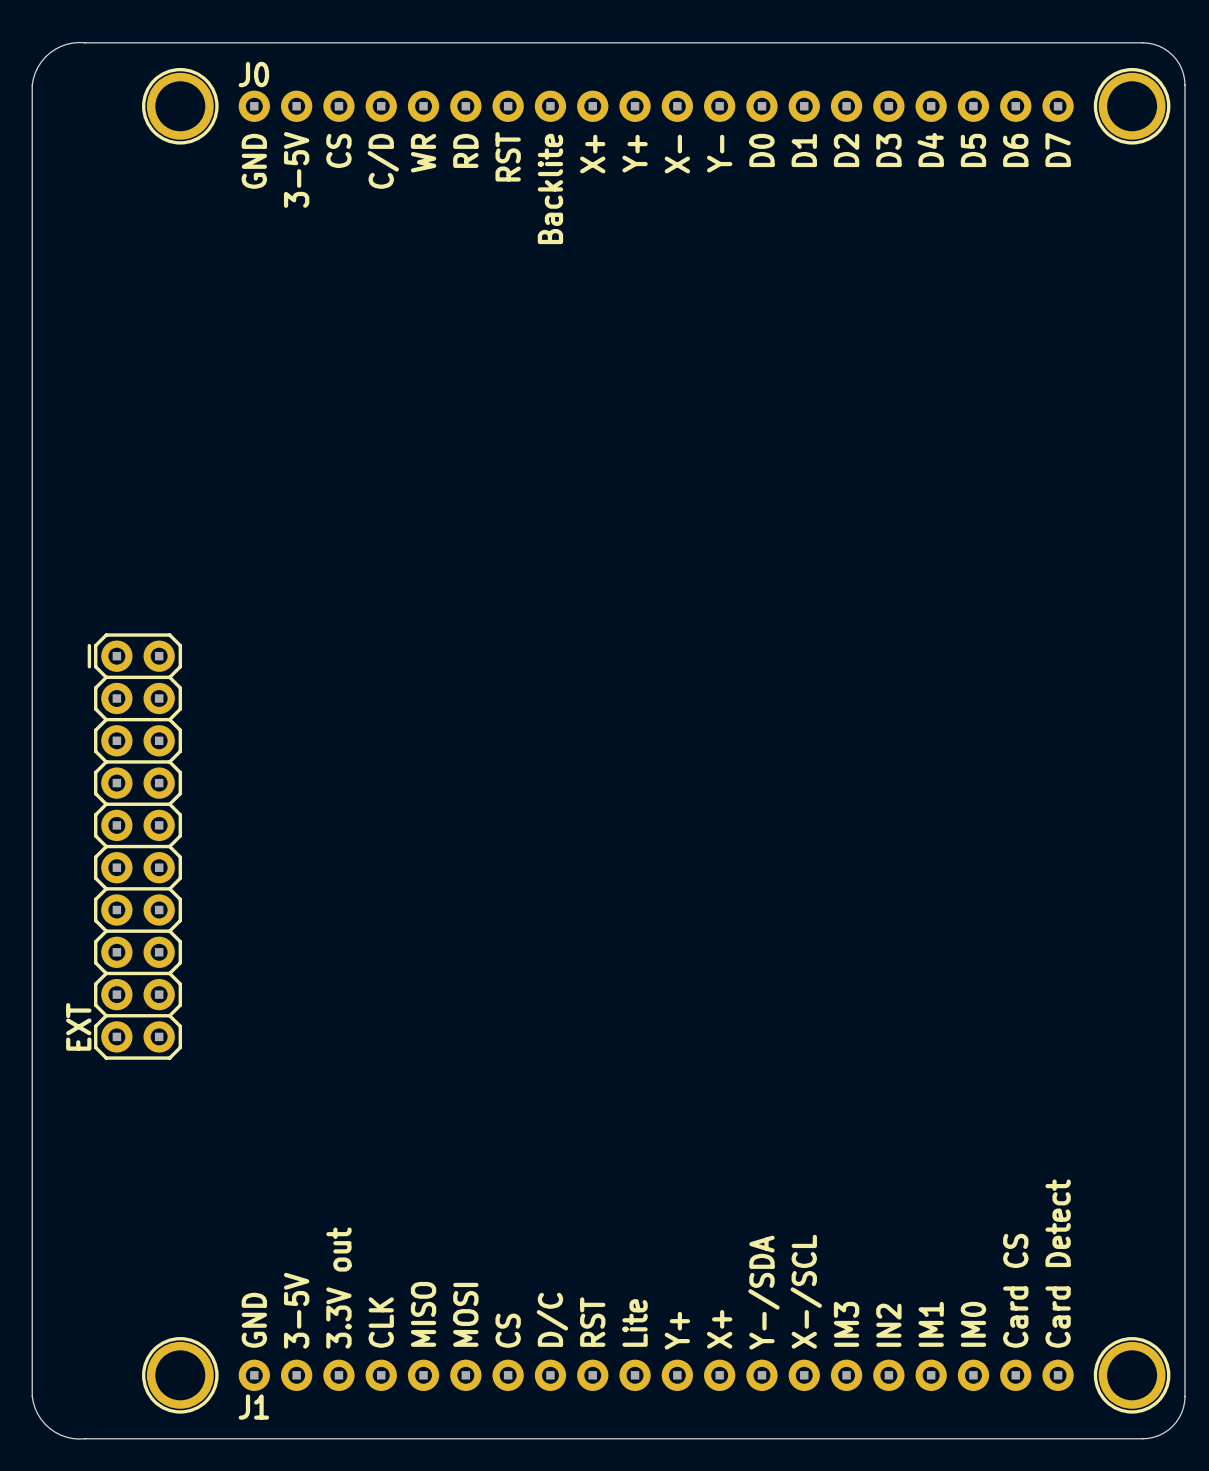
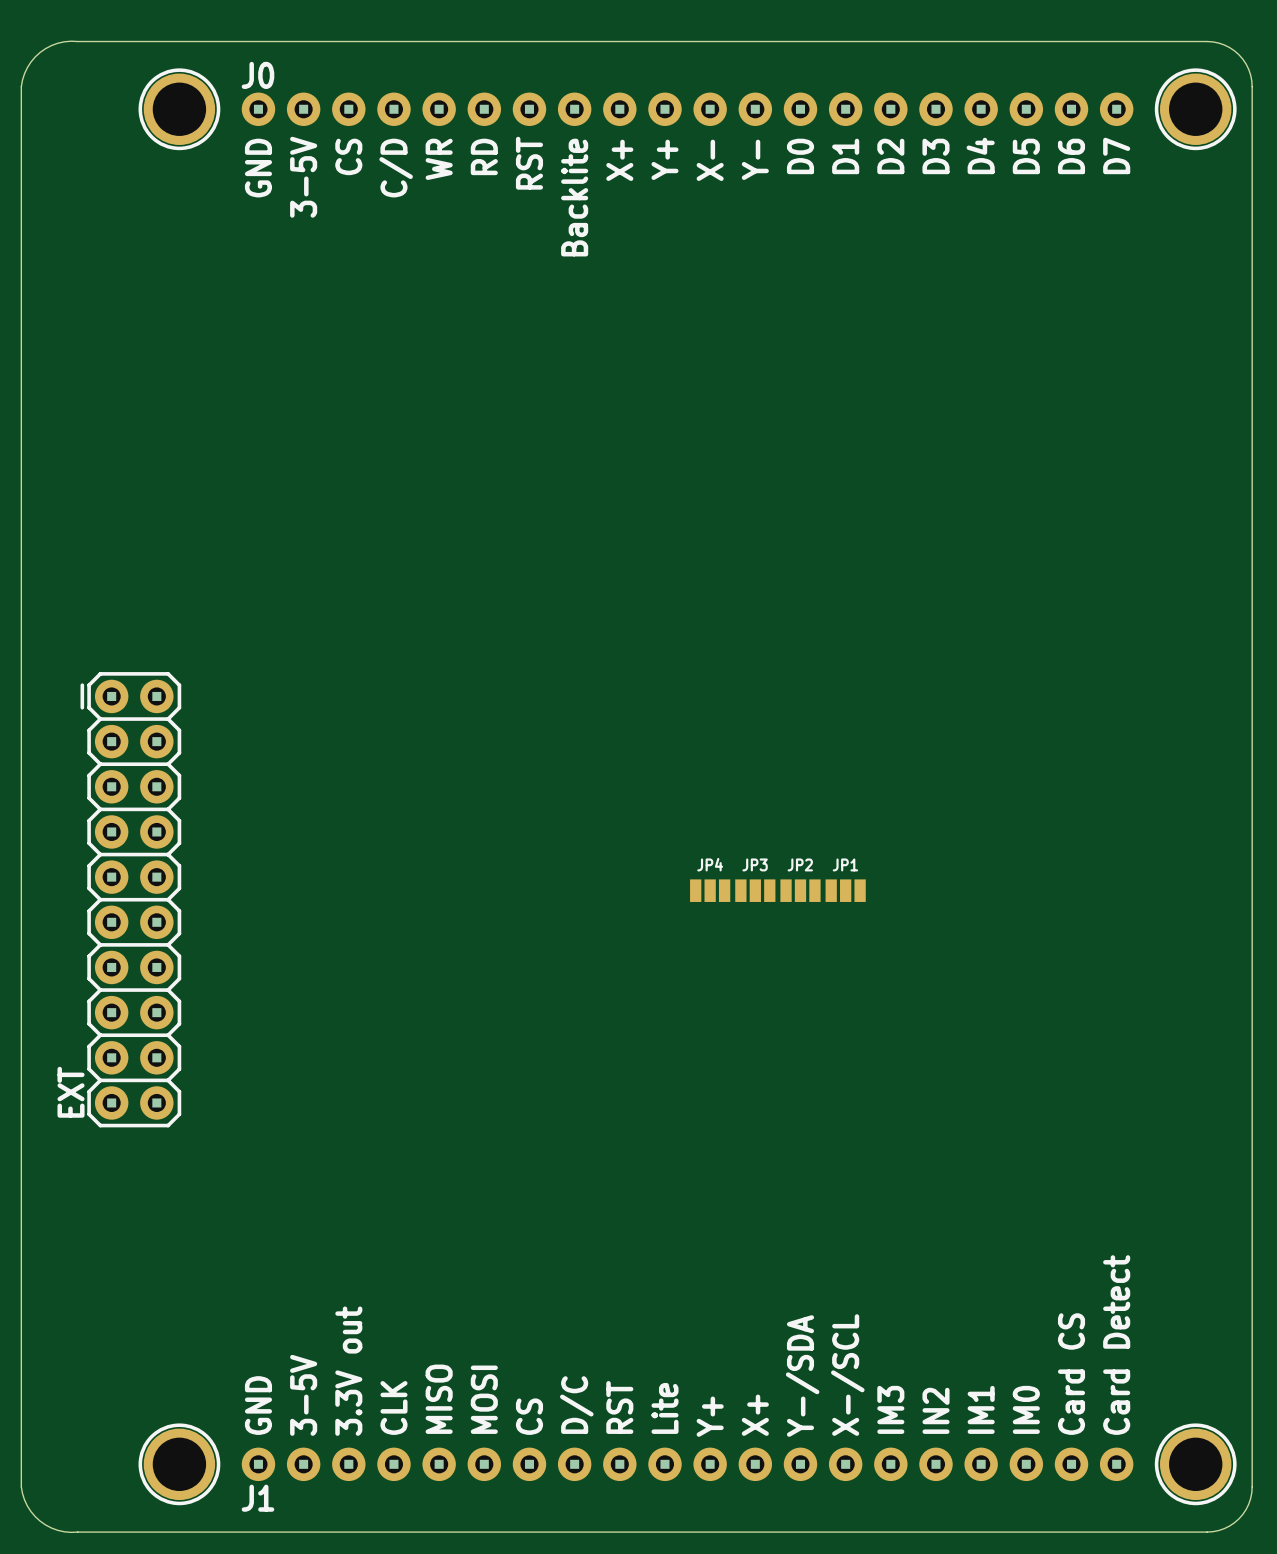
JP4: none -> (710, 890)
JP3: none -> (755, 890)
JP2: none -> (800, 890)
JP1: none -> (845, 890)

